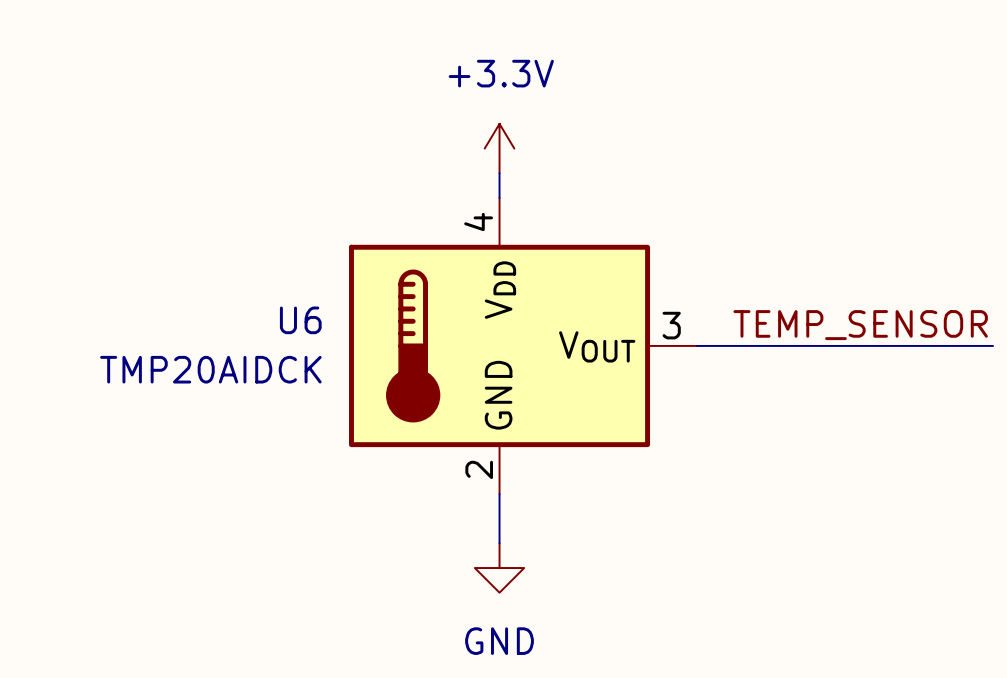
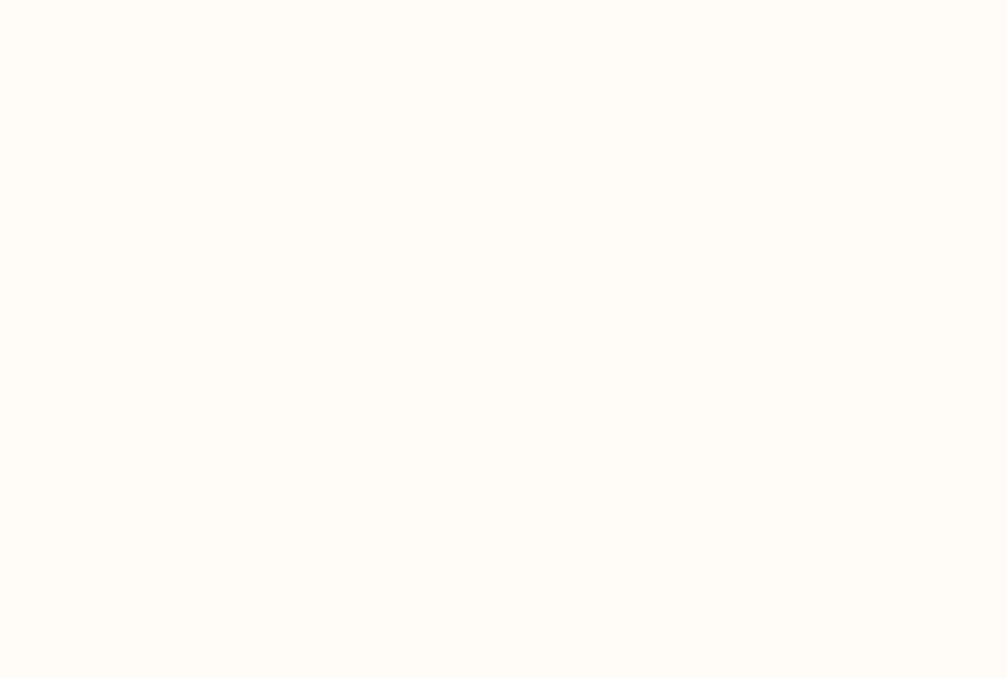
power symbol: +3.3V (499, 148) -> none
wire: (499, 173) (499, 197) -> none
label: TEMP_SENSOR (860, 325) -> none
U6: TMP20AIDCK (522, 345) -> none
wire: (696, 345) (993, 345) -> none
wire: (499, 494) (499, 543) -> none
power symbol: GND (499, 568) -> none

